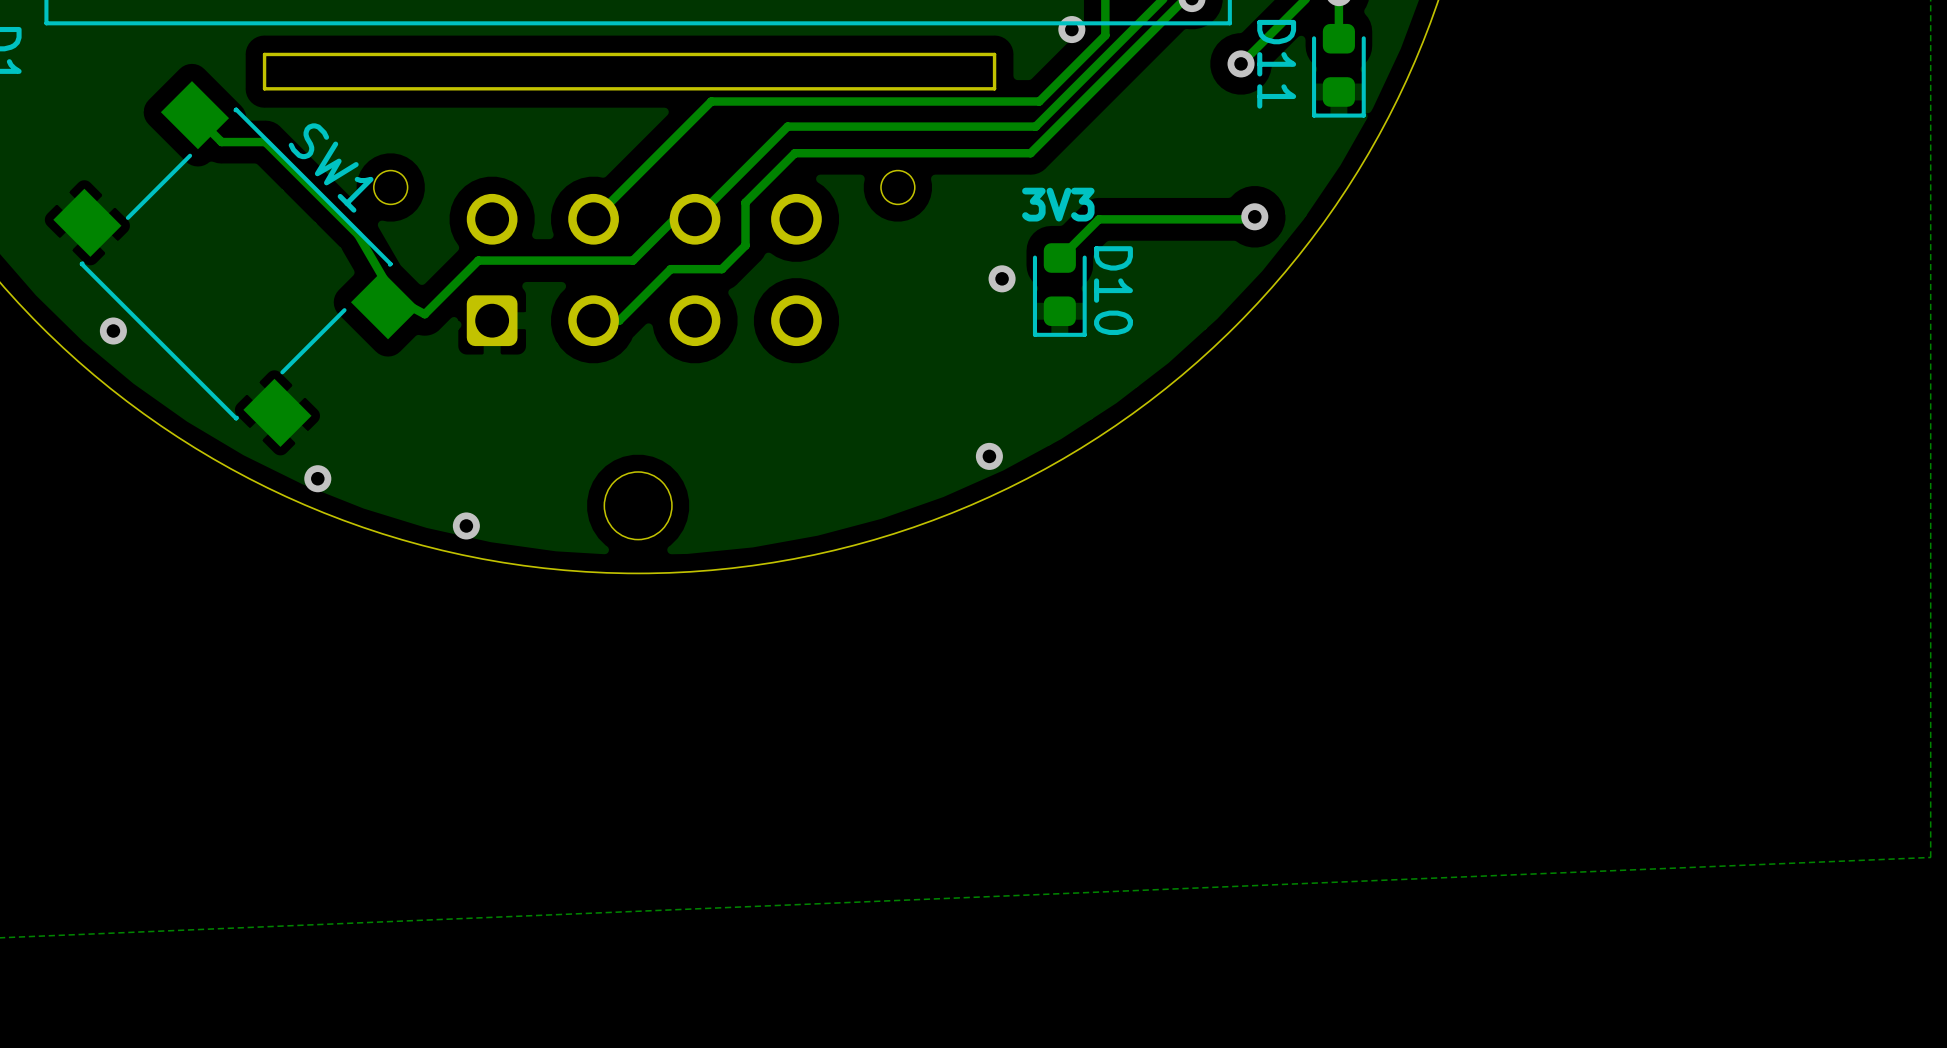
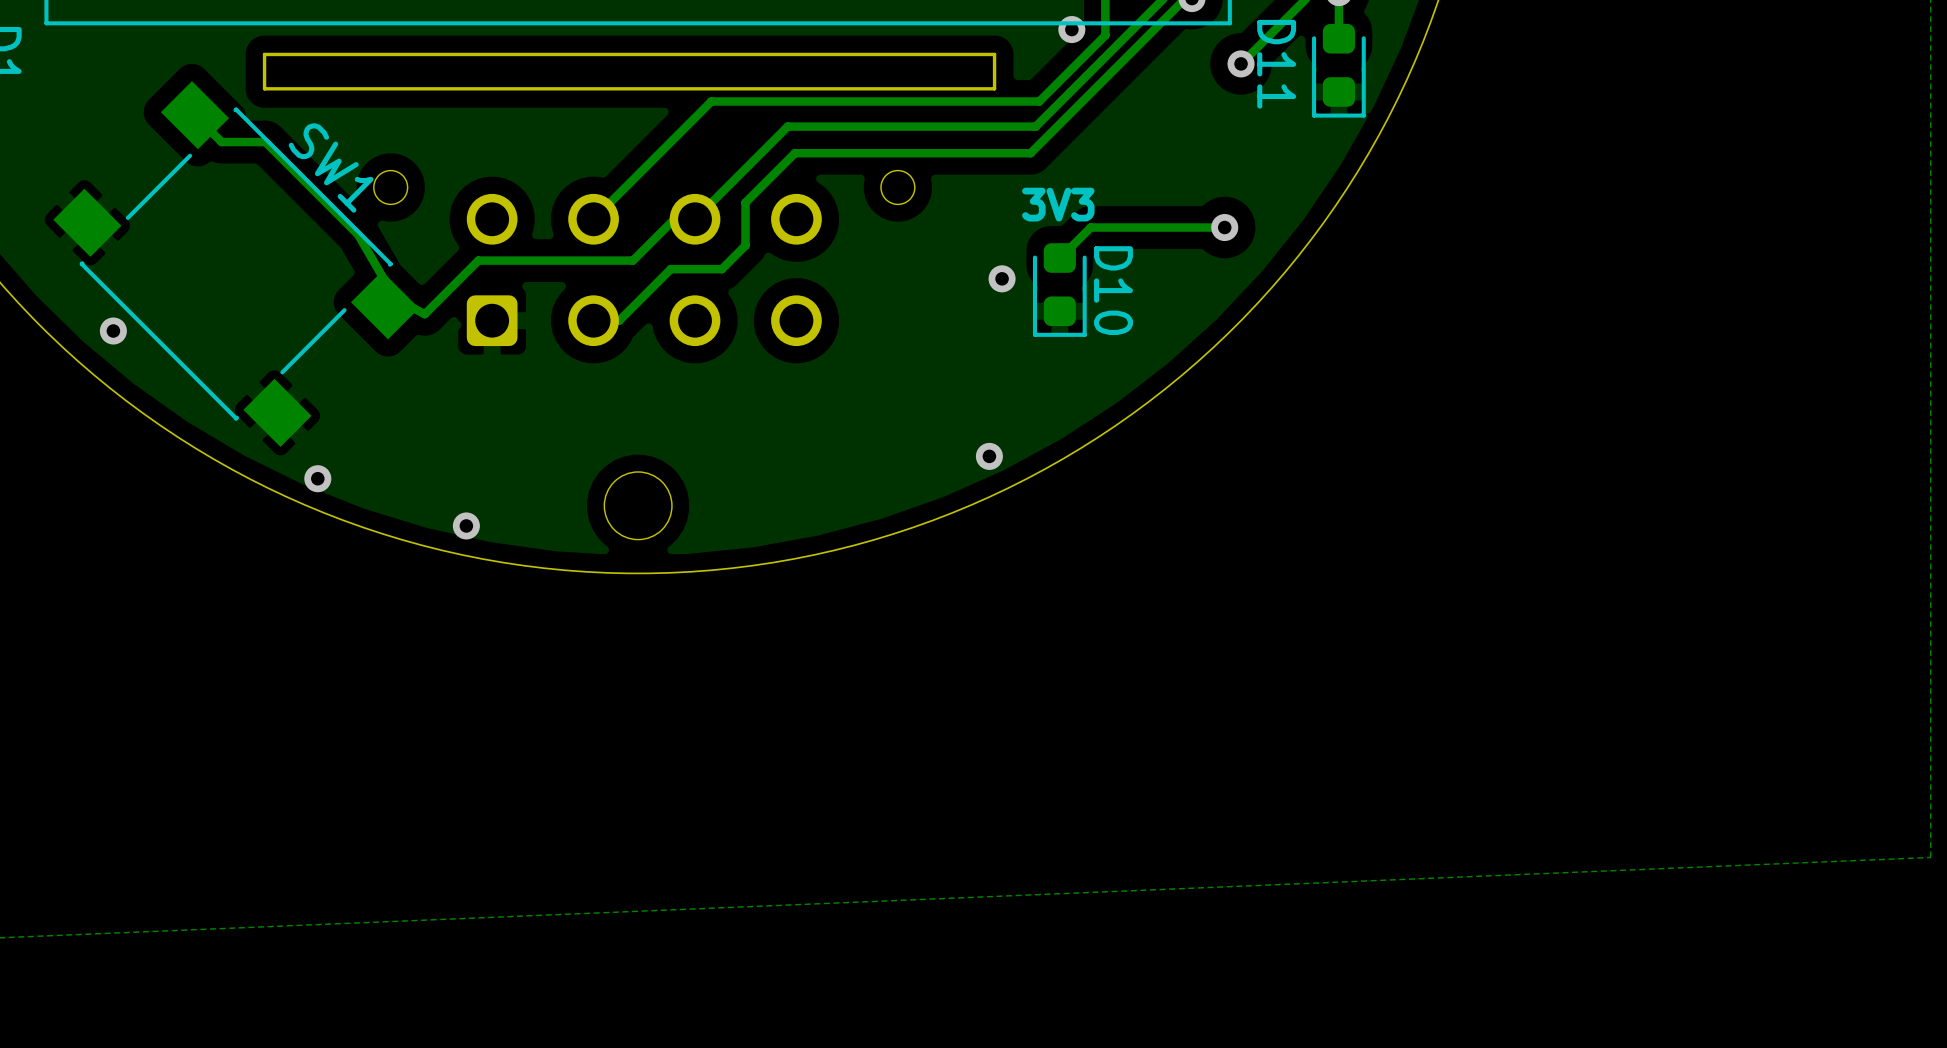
track: (1254, 216) (1252, 219) (1098, 219) (1090, 227) -> (1224, 227) (1090, 227)
via position: (1254, 216) -> (1224, 227)

